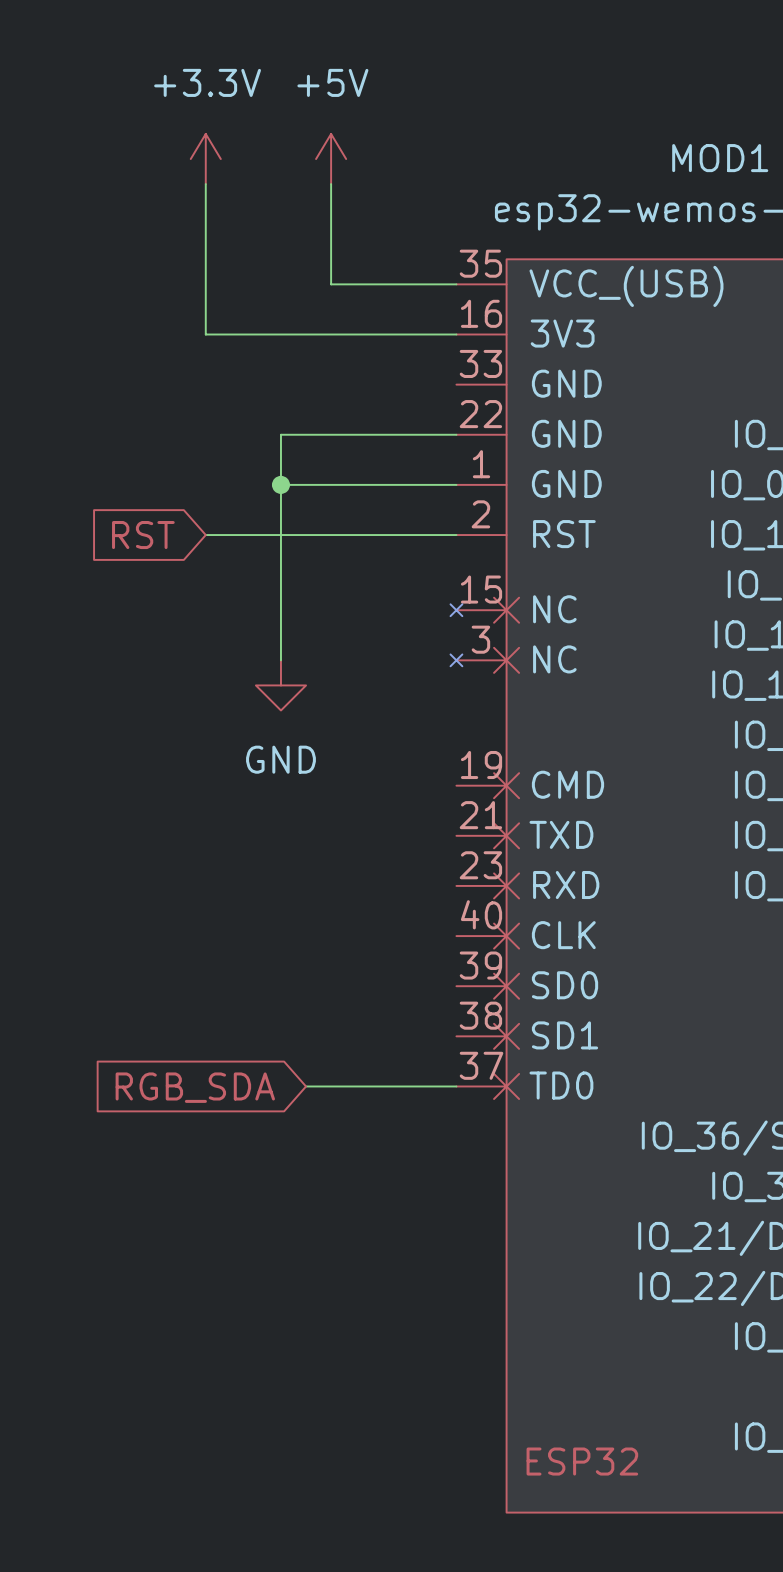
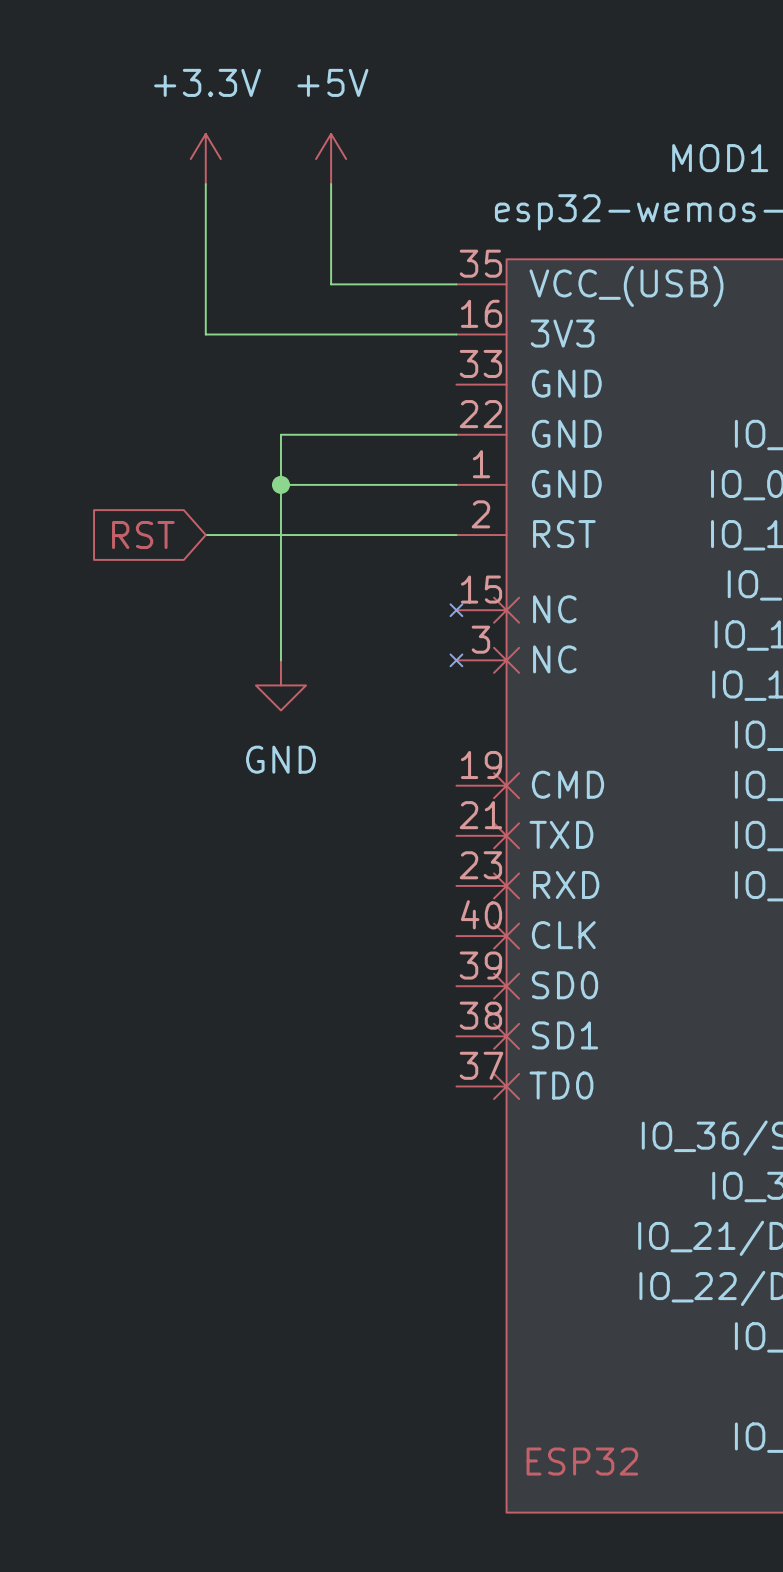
wire: (306, 1086) (456, 1086) -> none
global label: RGB_SDA (195, 1087) -> none

